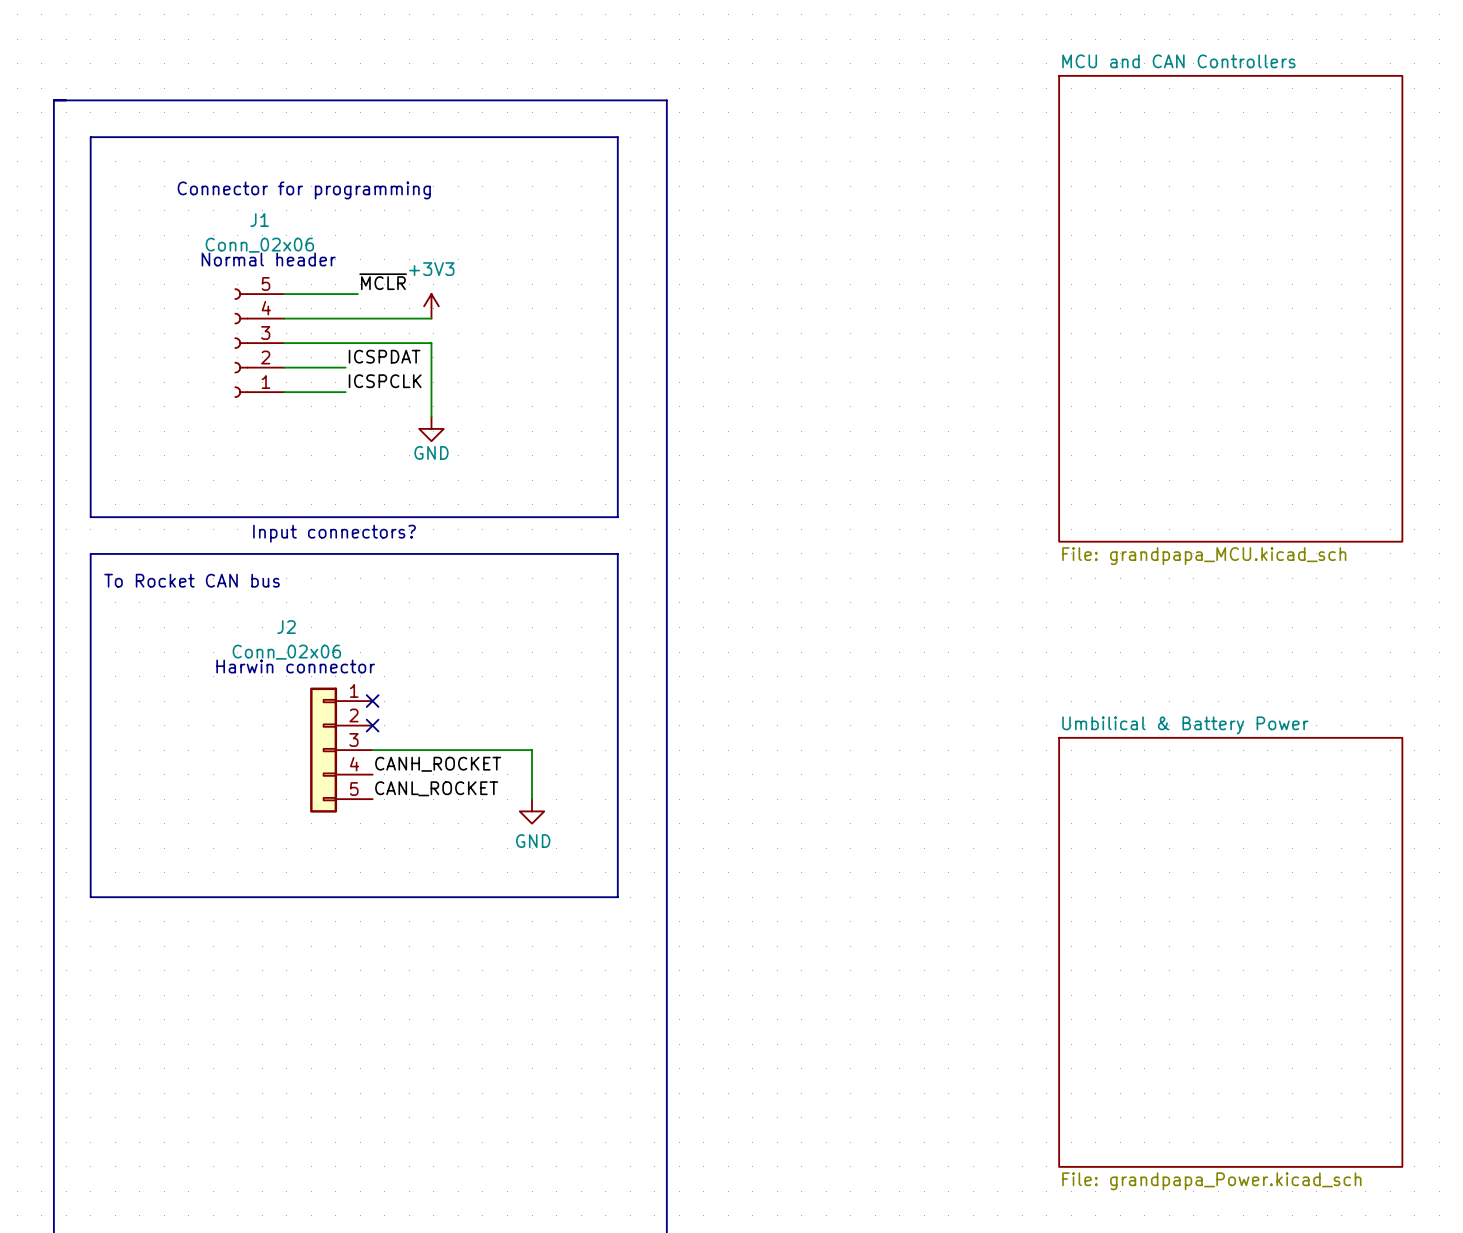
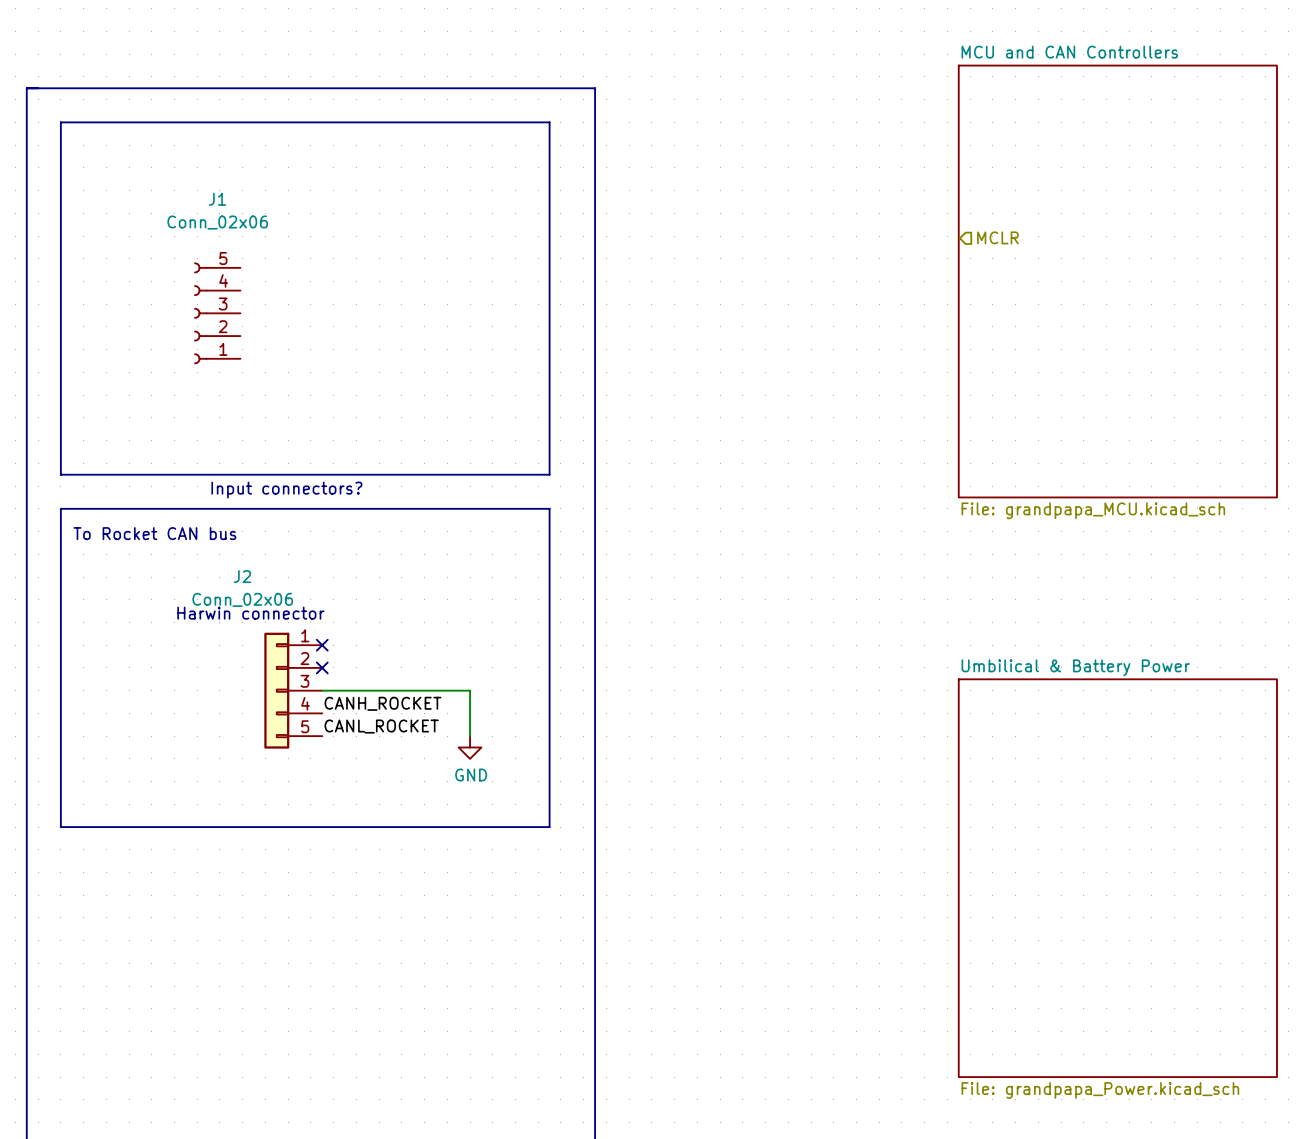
text: Connector for programming (304, 190) -> none
text: Normal header (268, 259) -> none
hierarchical label: none -> MCLR (997, 237)
label: ~{MCLR} (383, 281) -> none
wire: (284, 294) (357, 294) -> none
power symbol: +3V3 (431, 306) -> none
wire: (284, 318) (431, 318) -> none
wire: (284, 343) (431, 343) (431, 416) -> none
label: ICSPDAT (384, 356) -> none
wire: (284, 367) (345, 367) -> none
label: ICSPCLK (385, 381) -> none
wire: (284, 392) (345, 392) -> none
power symbol: GND (431, 428) -> none

